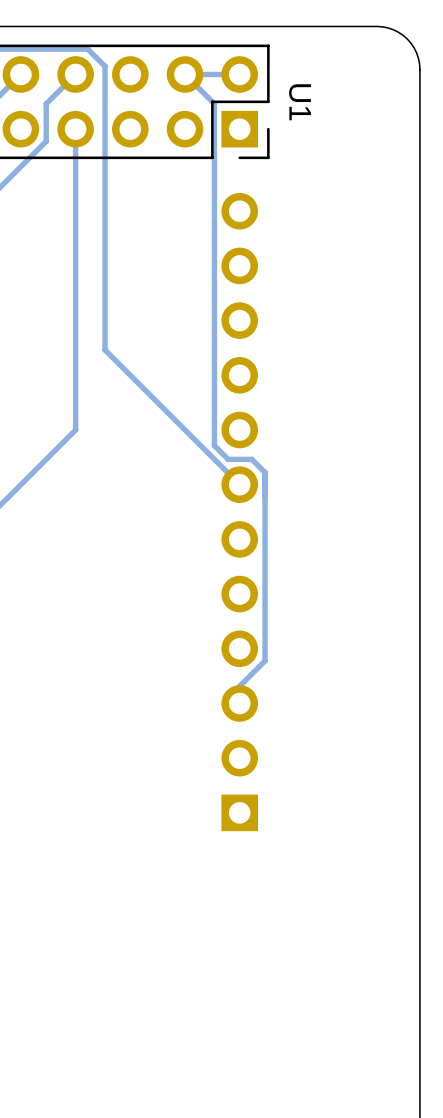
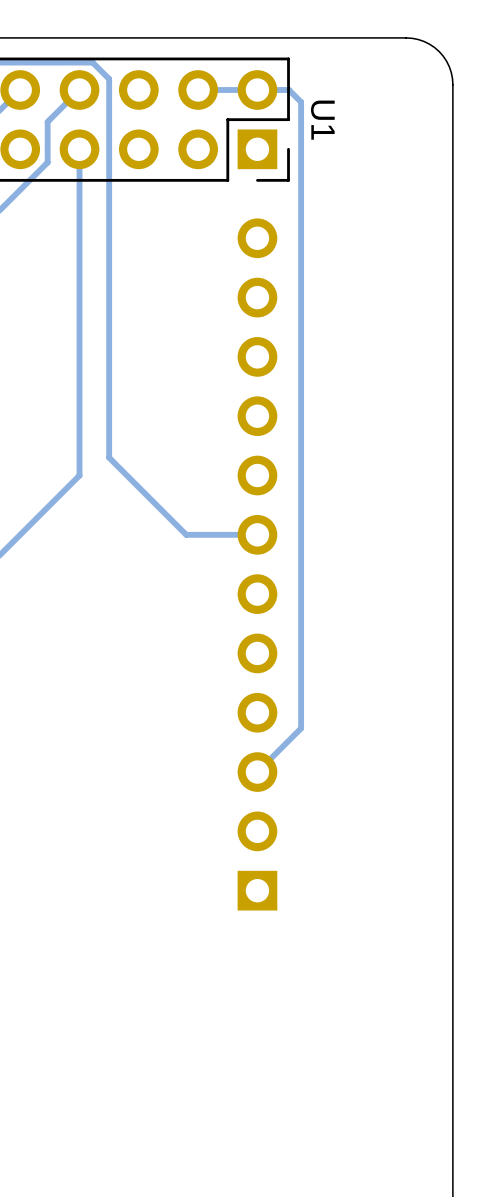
track: (102, 64) (105, 66) (105, 350) (239, 484) -> (109, 79) (109, 457) (186, 534) (257, 534)
track: (185, 74) (214, 103) (214, 445) (228, 459) (251, 459) (265, 472) (265, 660) (239, 686) (239, 703) -> (257, 90) (288, 90) (301, 102) (301, 728) (257, 772)

